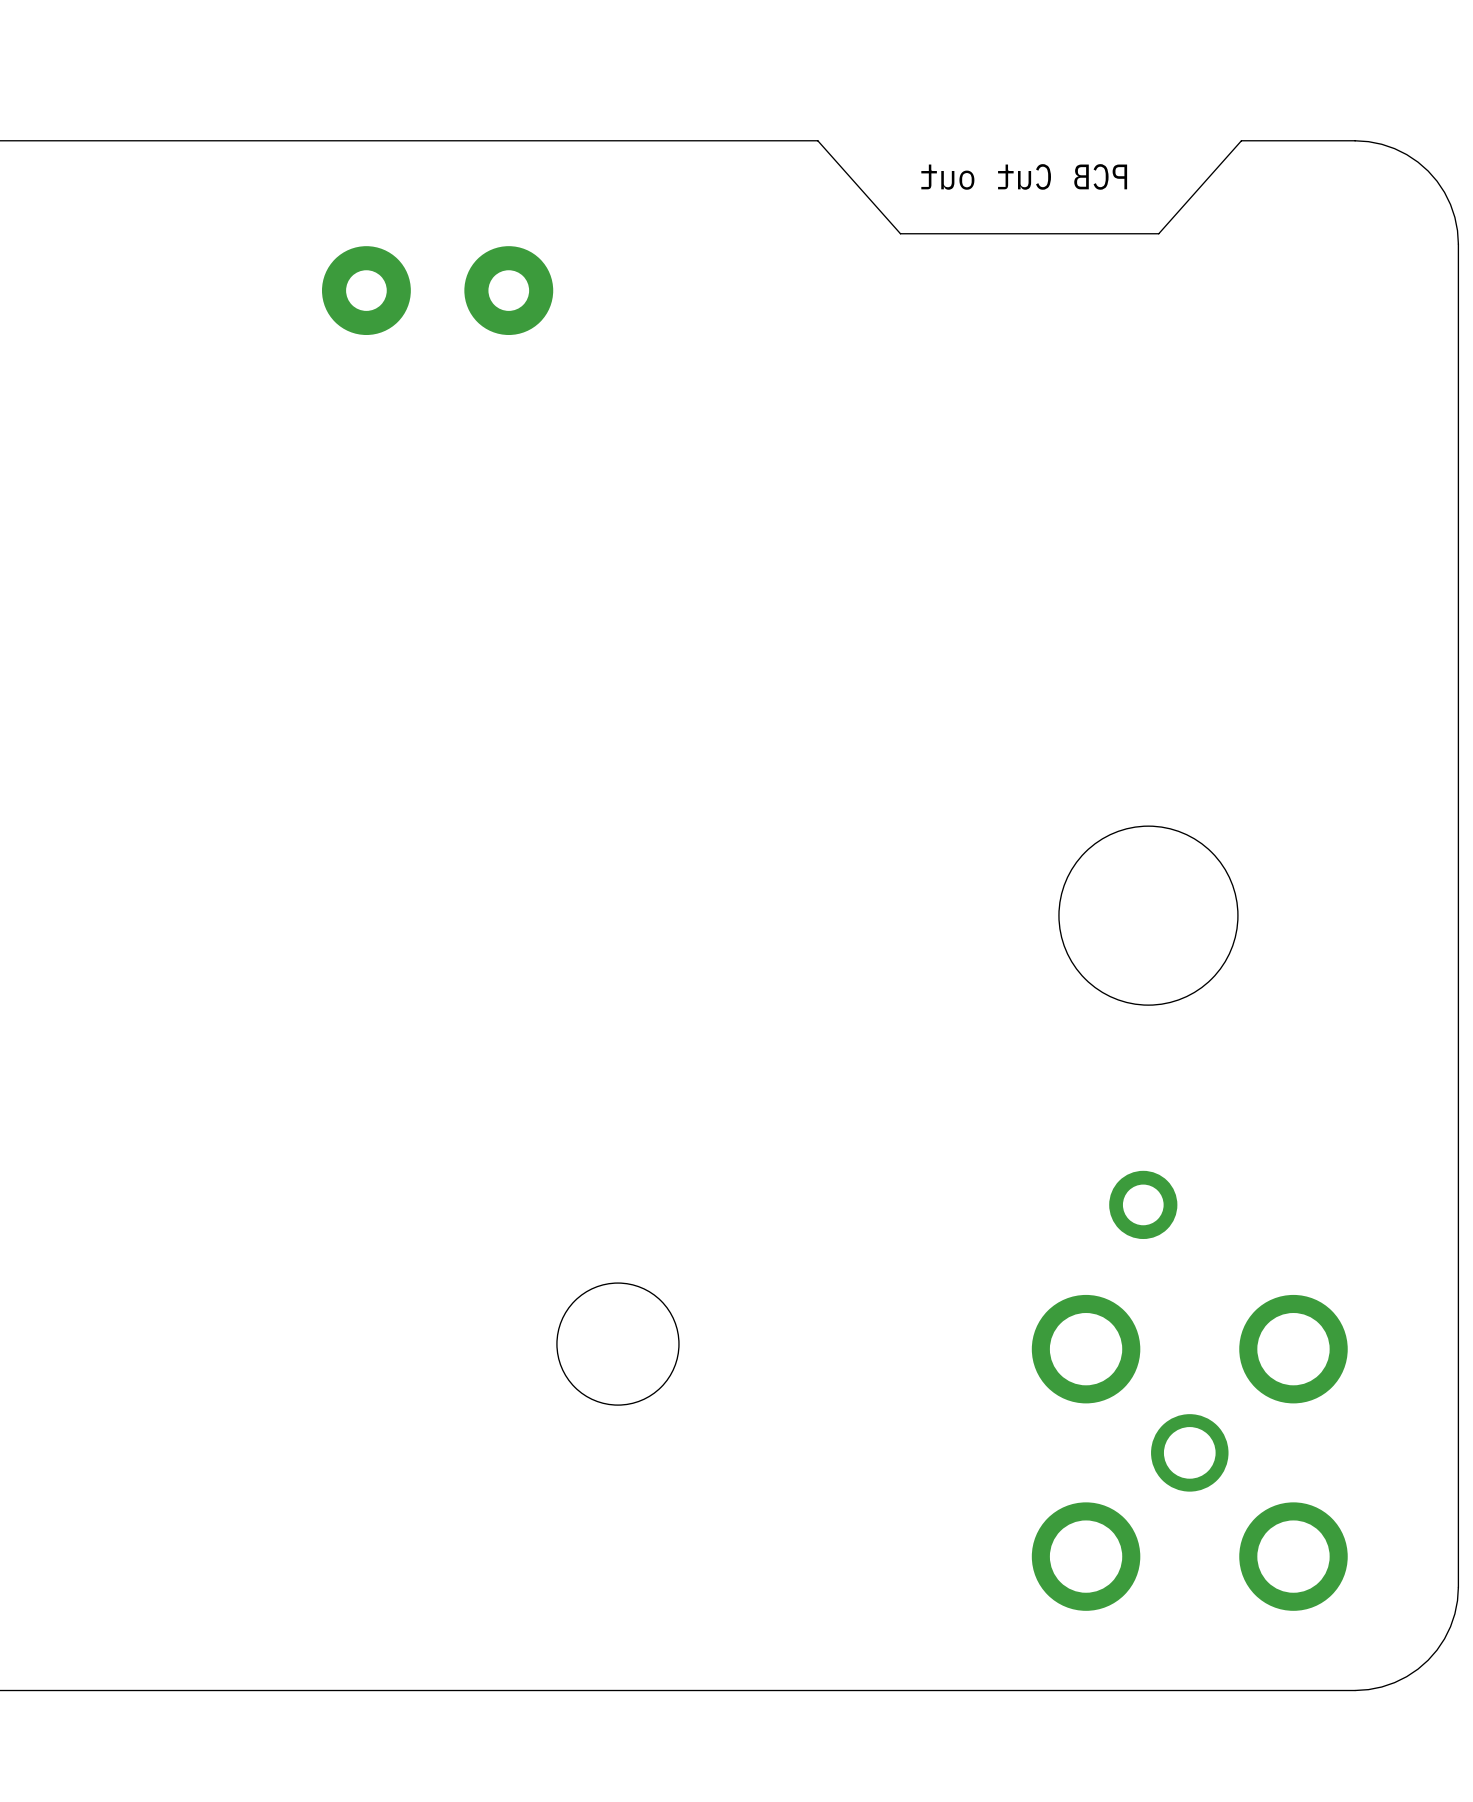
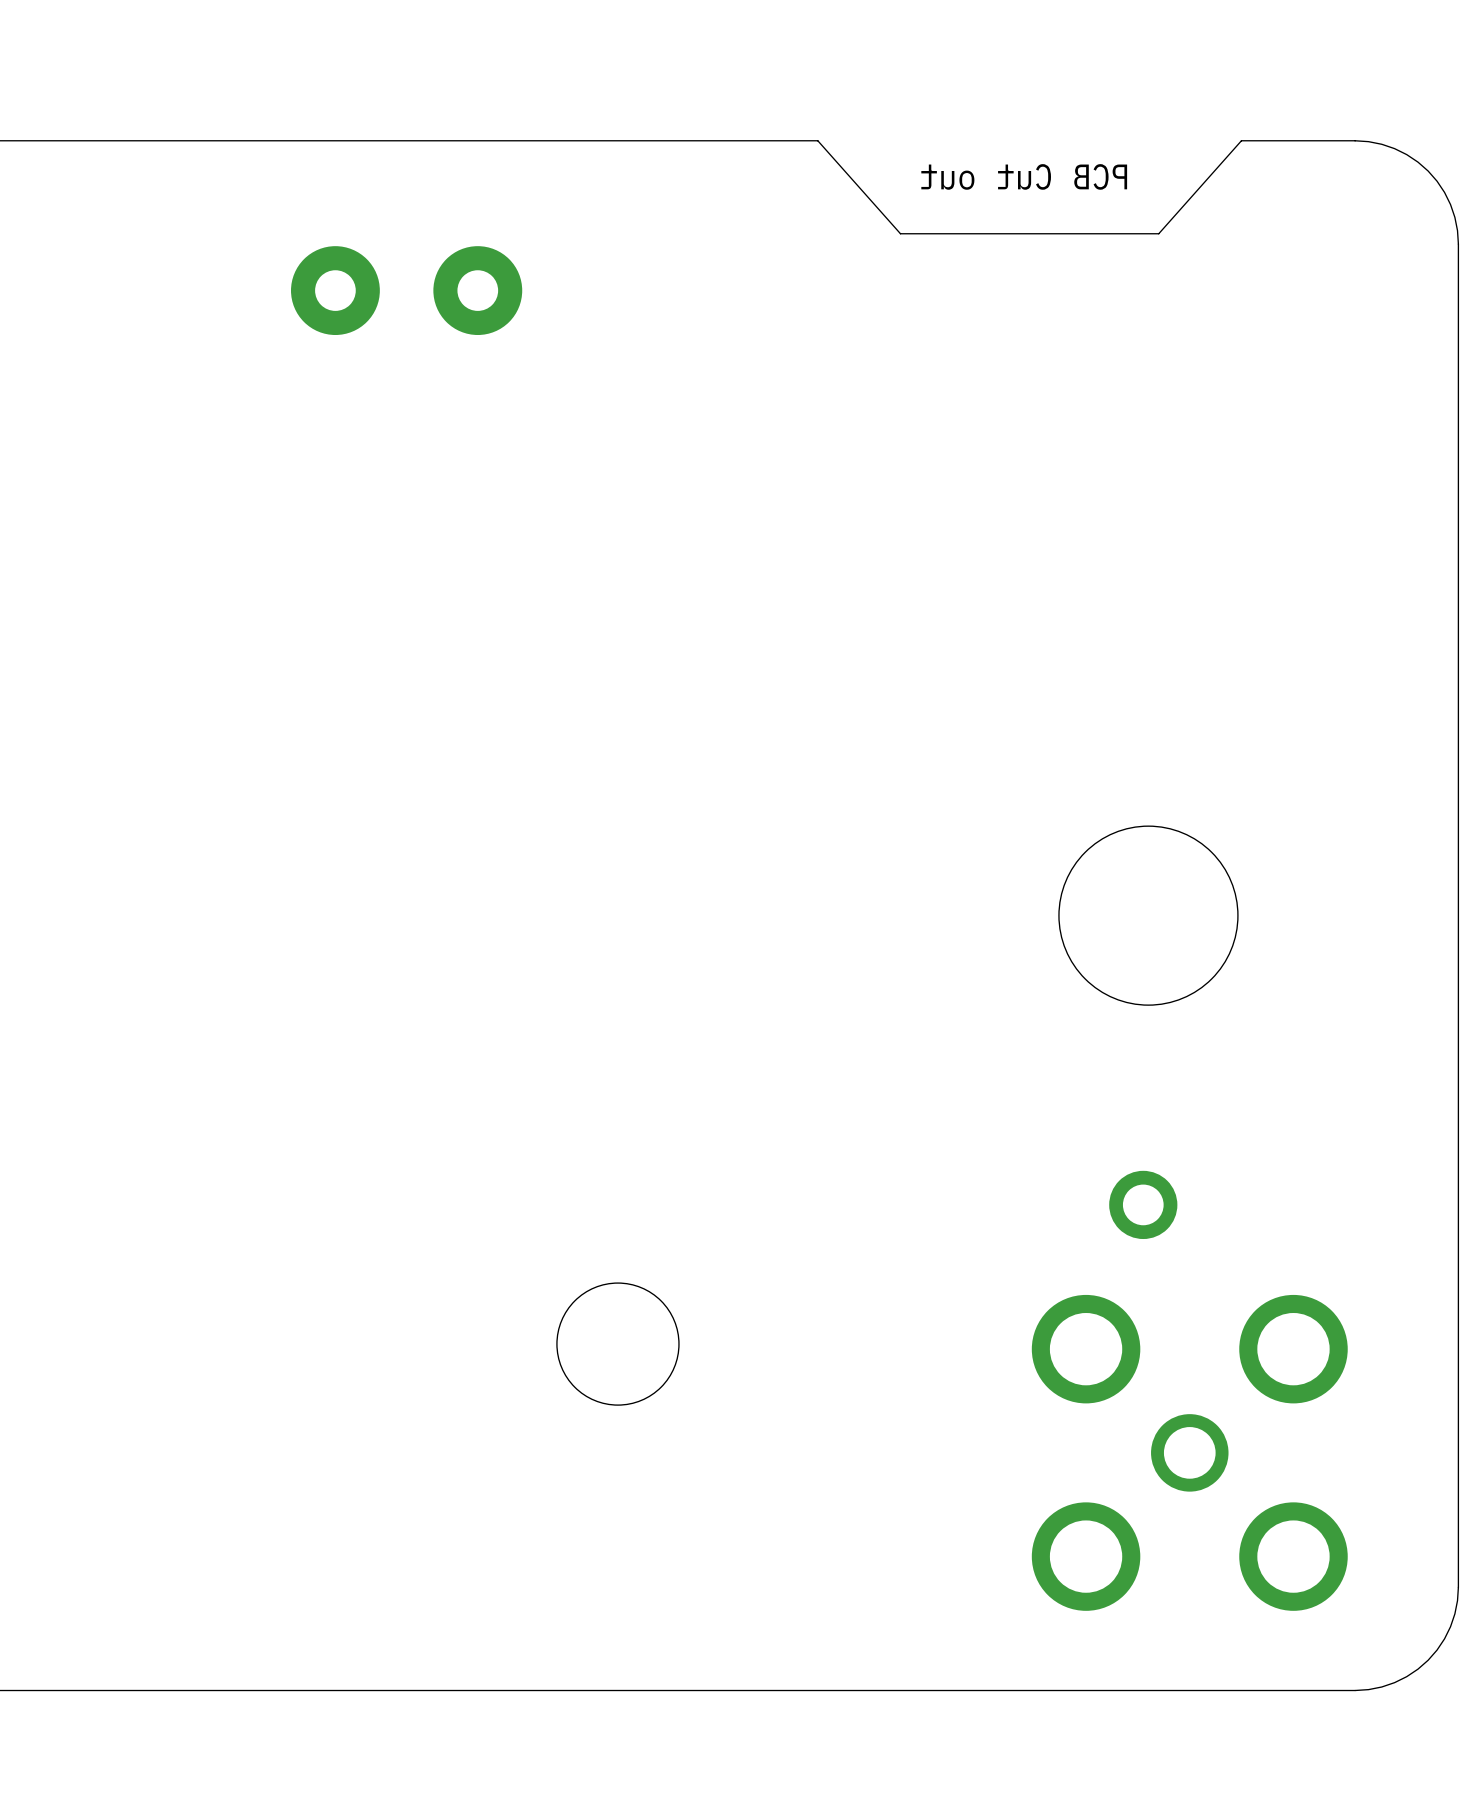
part position: (437, 290) -> (406, 290)

